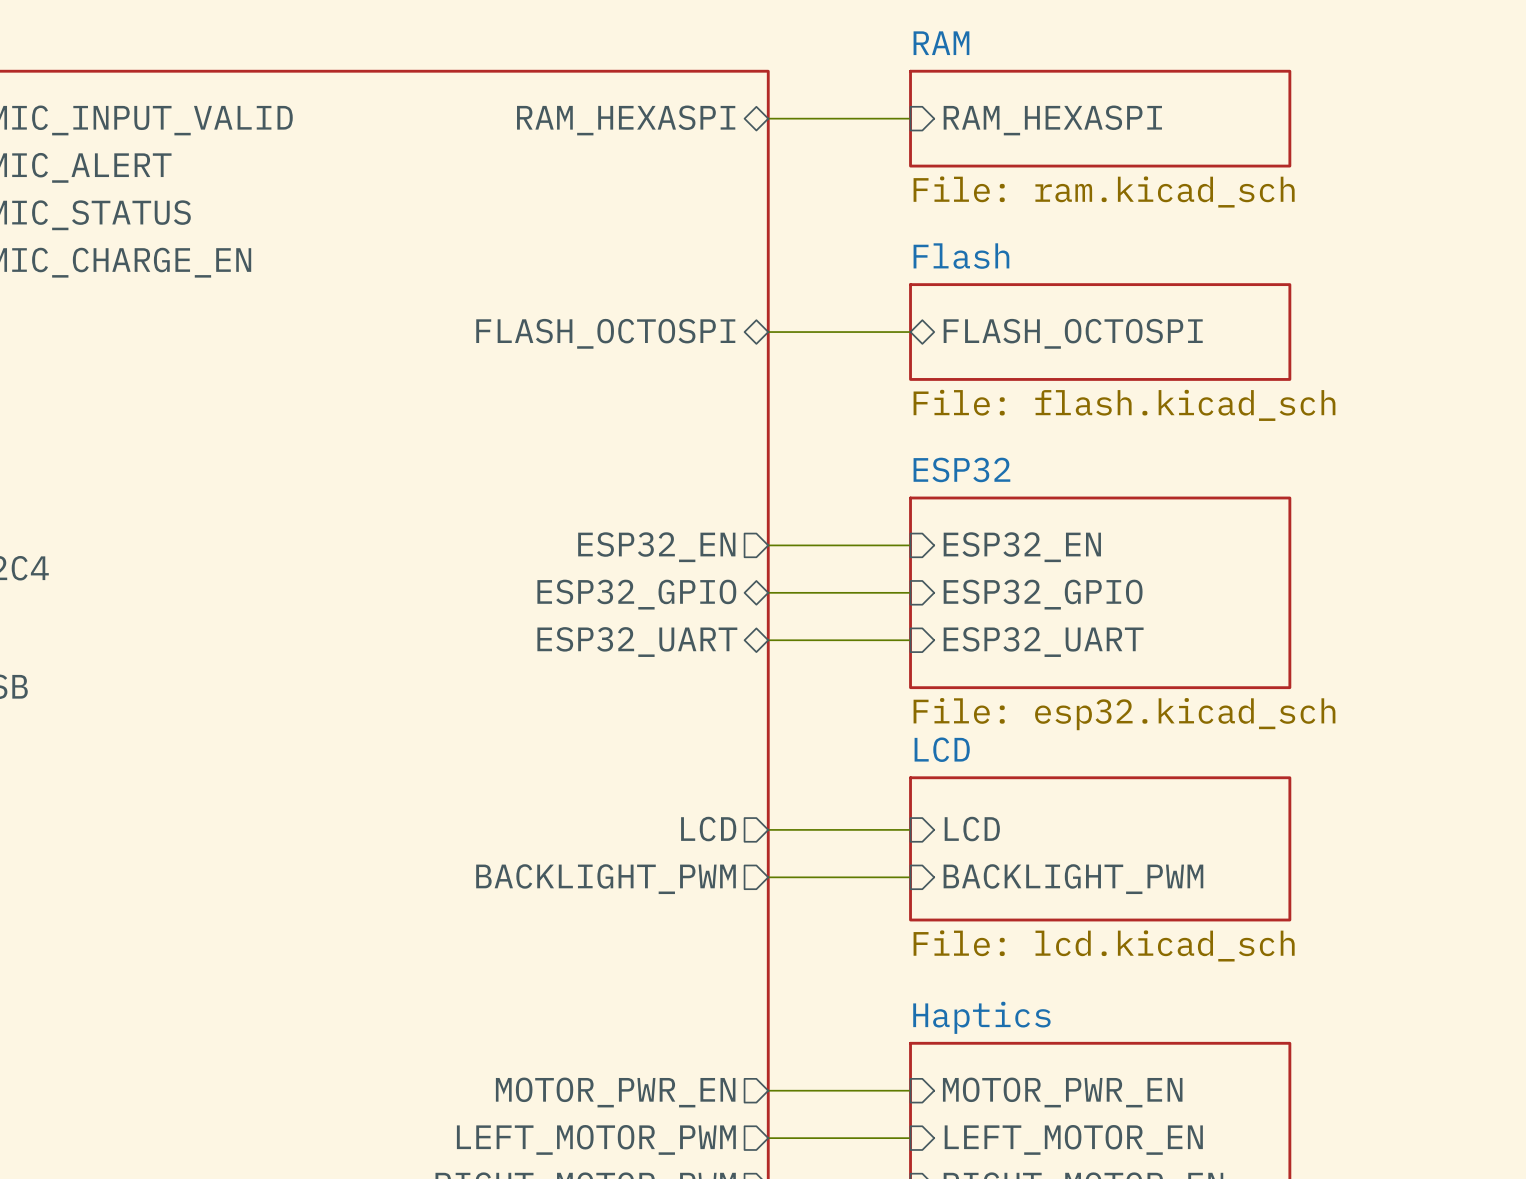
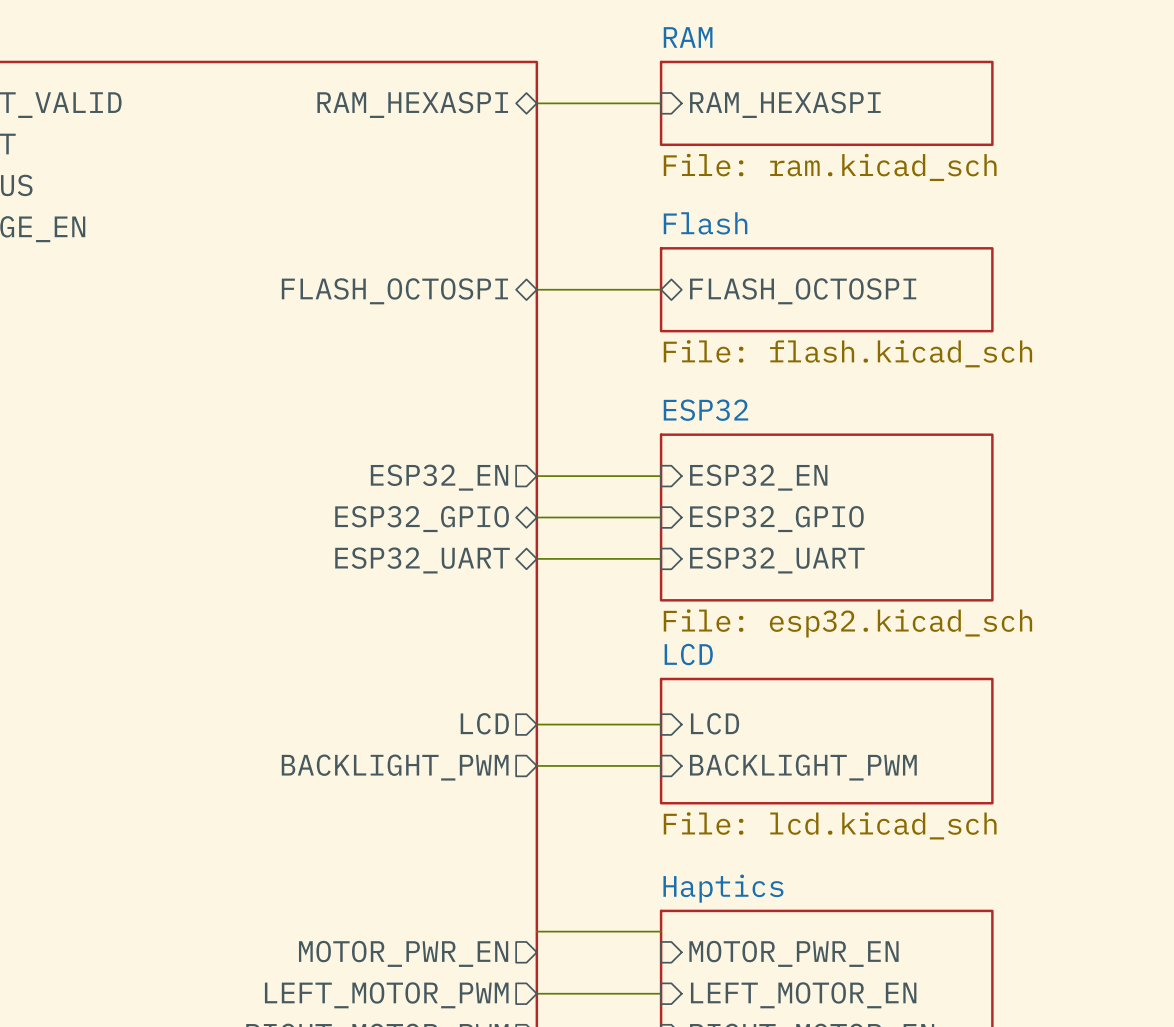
wire: (768, 1090) (910, 1090) -> (536, 931) (661, 931)

